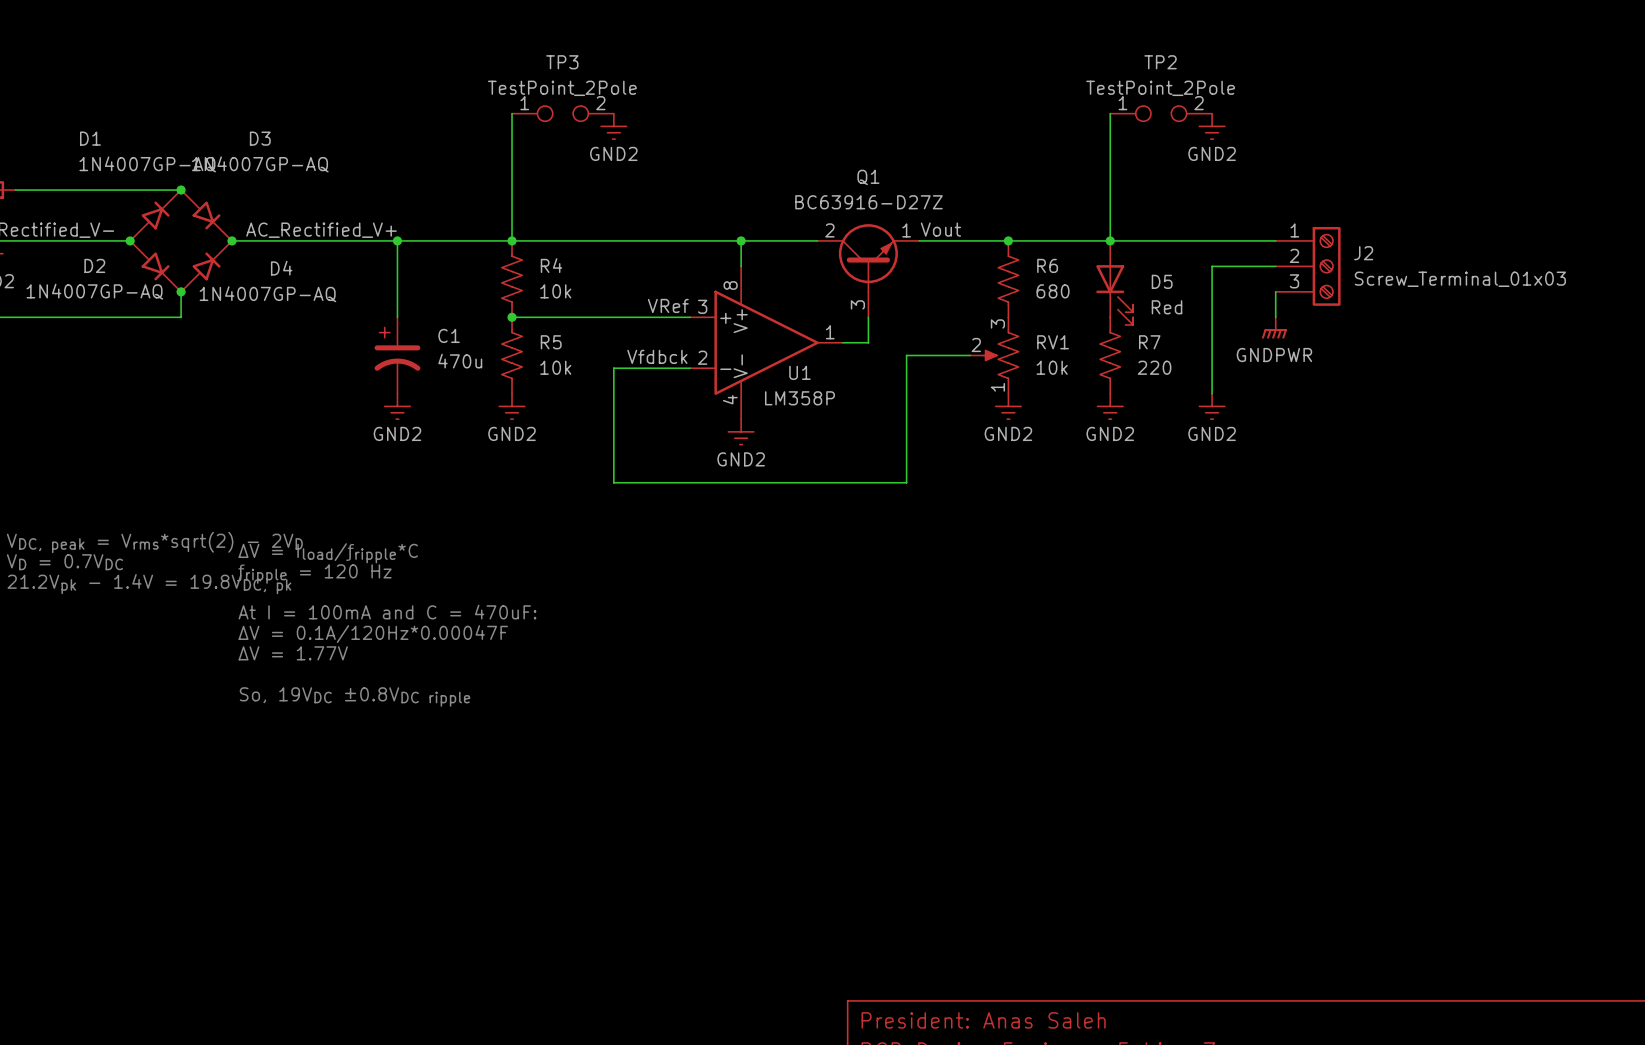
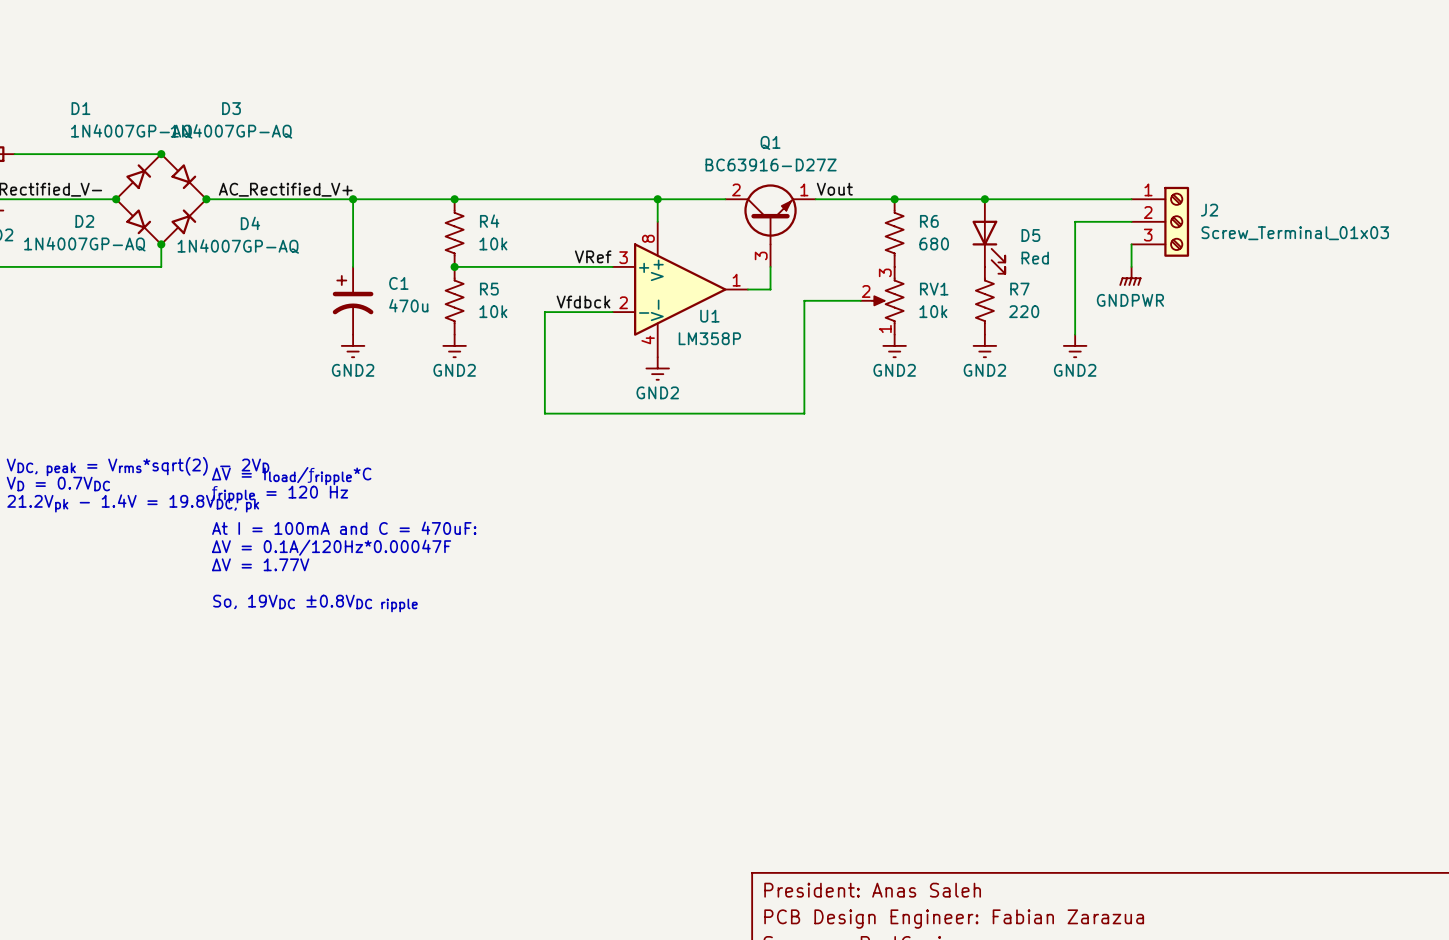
wire: (512, 113) (512, 240) -> none
TP3: TestPoint_2Pole (562, 113) -> none
wire: (1110, 113) (1110, 240) -> none
TP2: TestPoint_2Pole (1161, 113) -> none
power symbol: GND2 (613, 126) -> none
power symbol: GND2 (1212, 126) -> none

